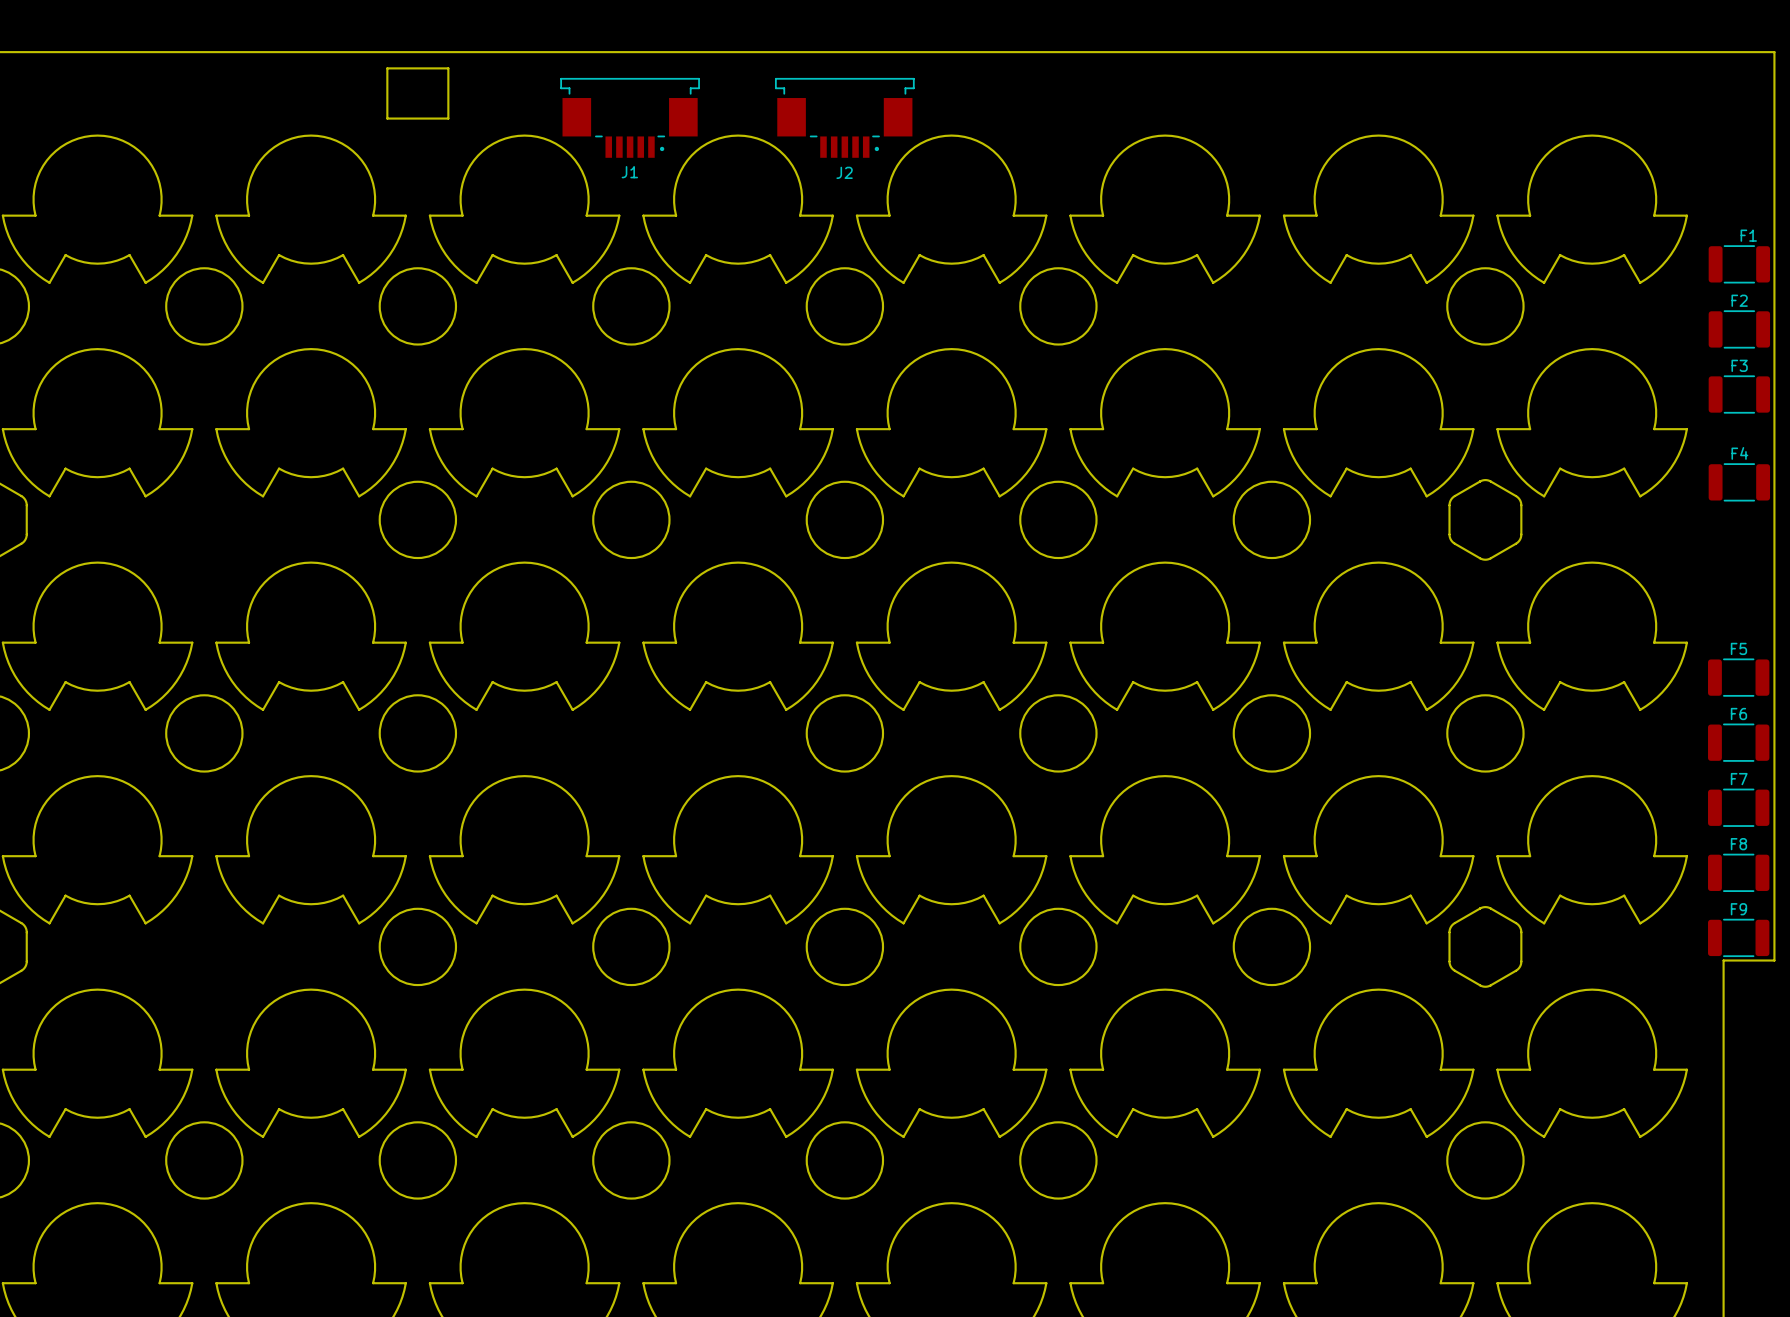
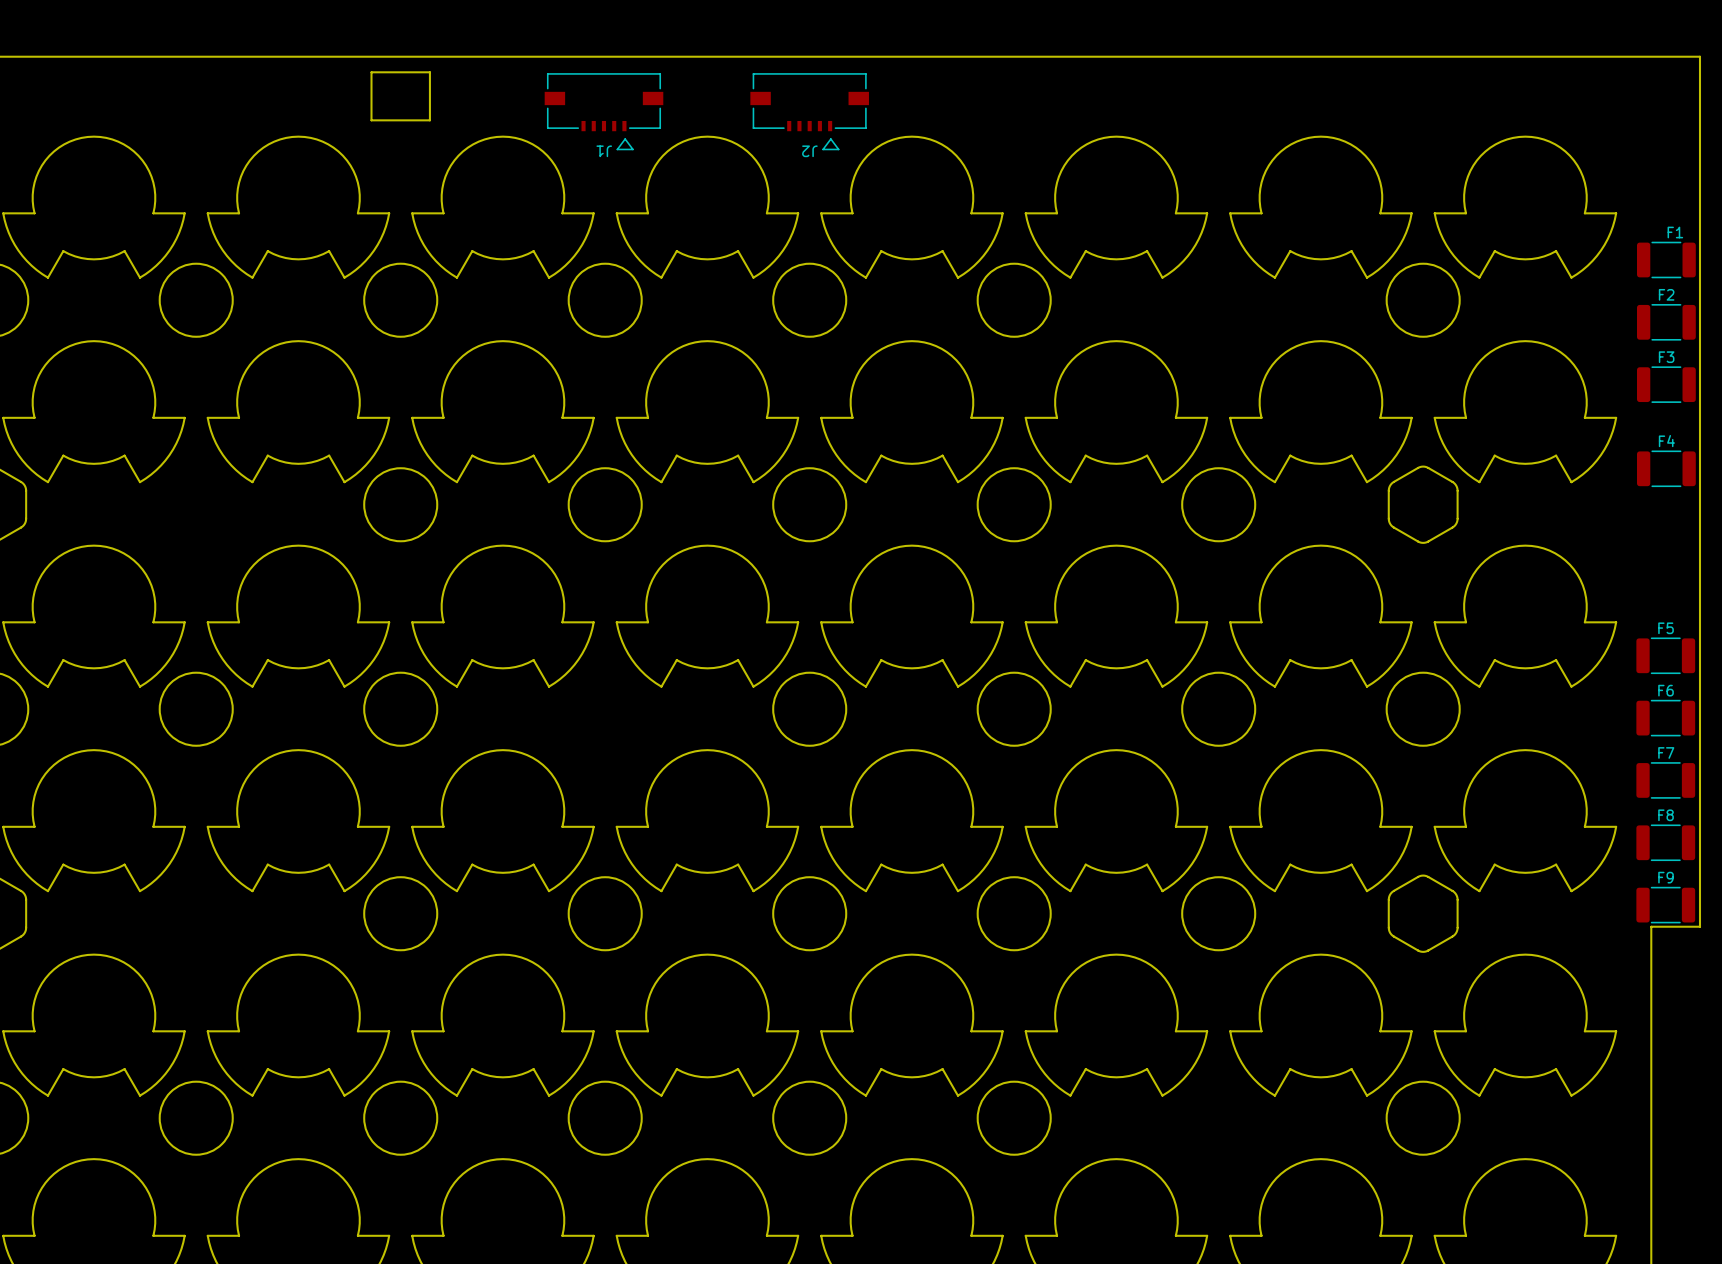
J1 footprint: [560, 78, 700, 158] -> [544, 73, 664, 151]
J2 footprint: [775, 78, 915, 158] -> [750, 73, 869, 151]

